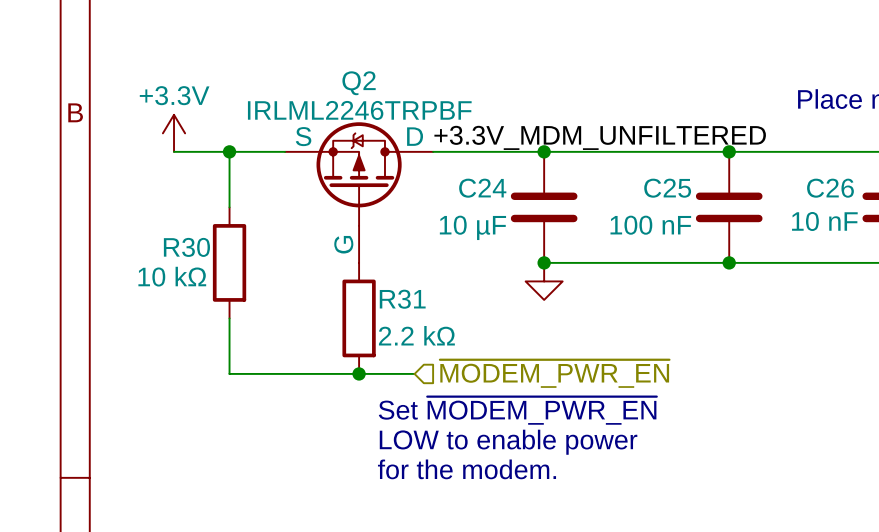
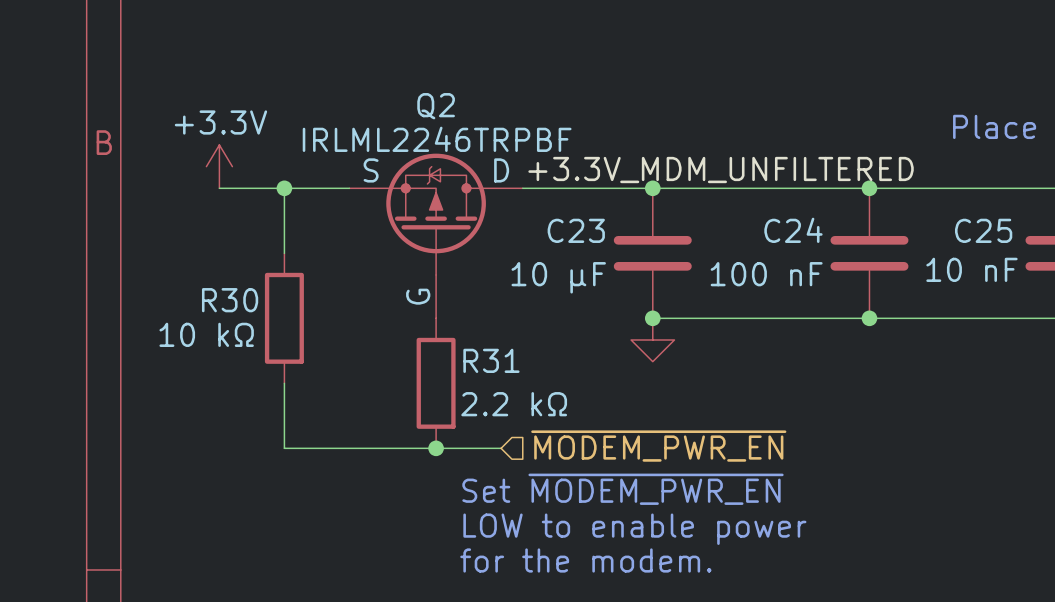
C24 name: C24 (482, 188) -> C23 (576, 230)
C25 name: C25 (667, 188) -> C24 (793, 230)
C26 name: C26 (830, 188) -> C25 (983, 230)

